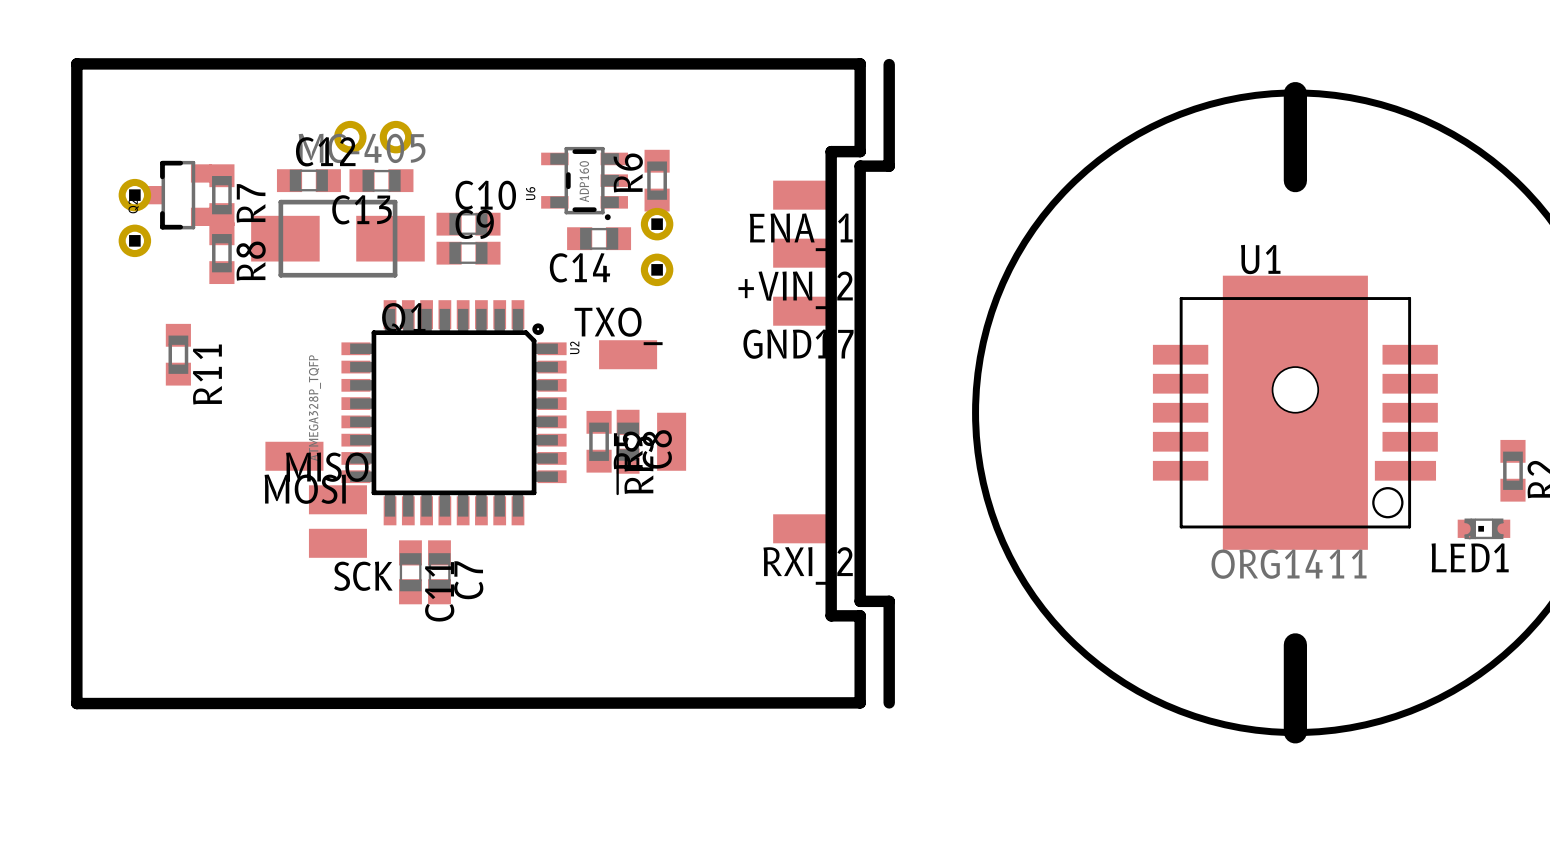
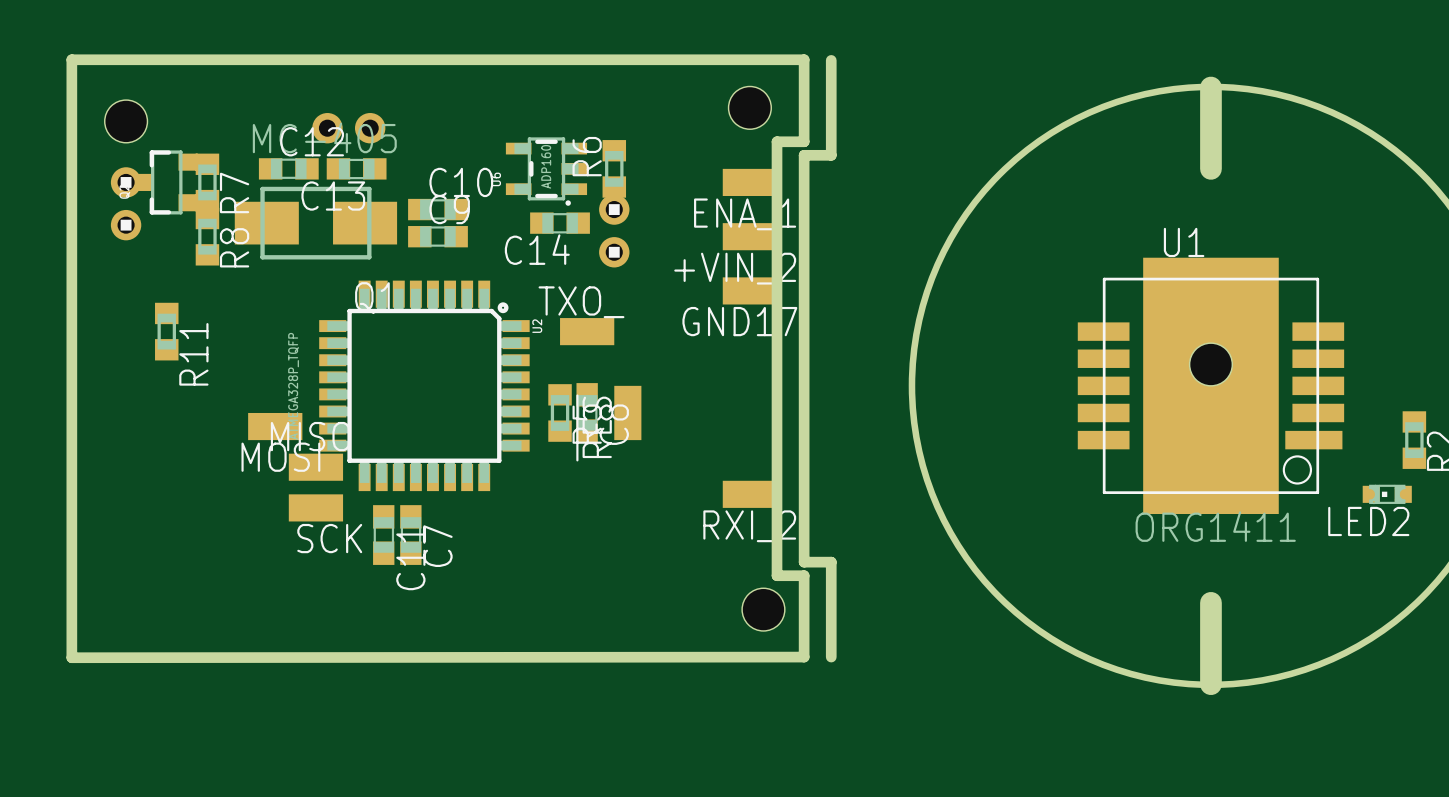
hole: none -> (749, 107)
hole: none -> (126, 121)
LED1 name: LED1 (1470, 557) -> LED2 (1368, 521)
hole: none -> (763, 609)

